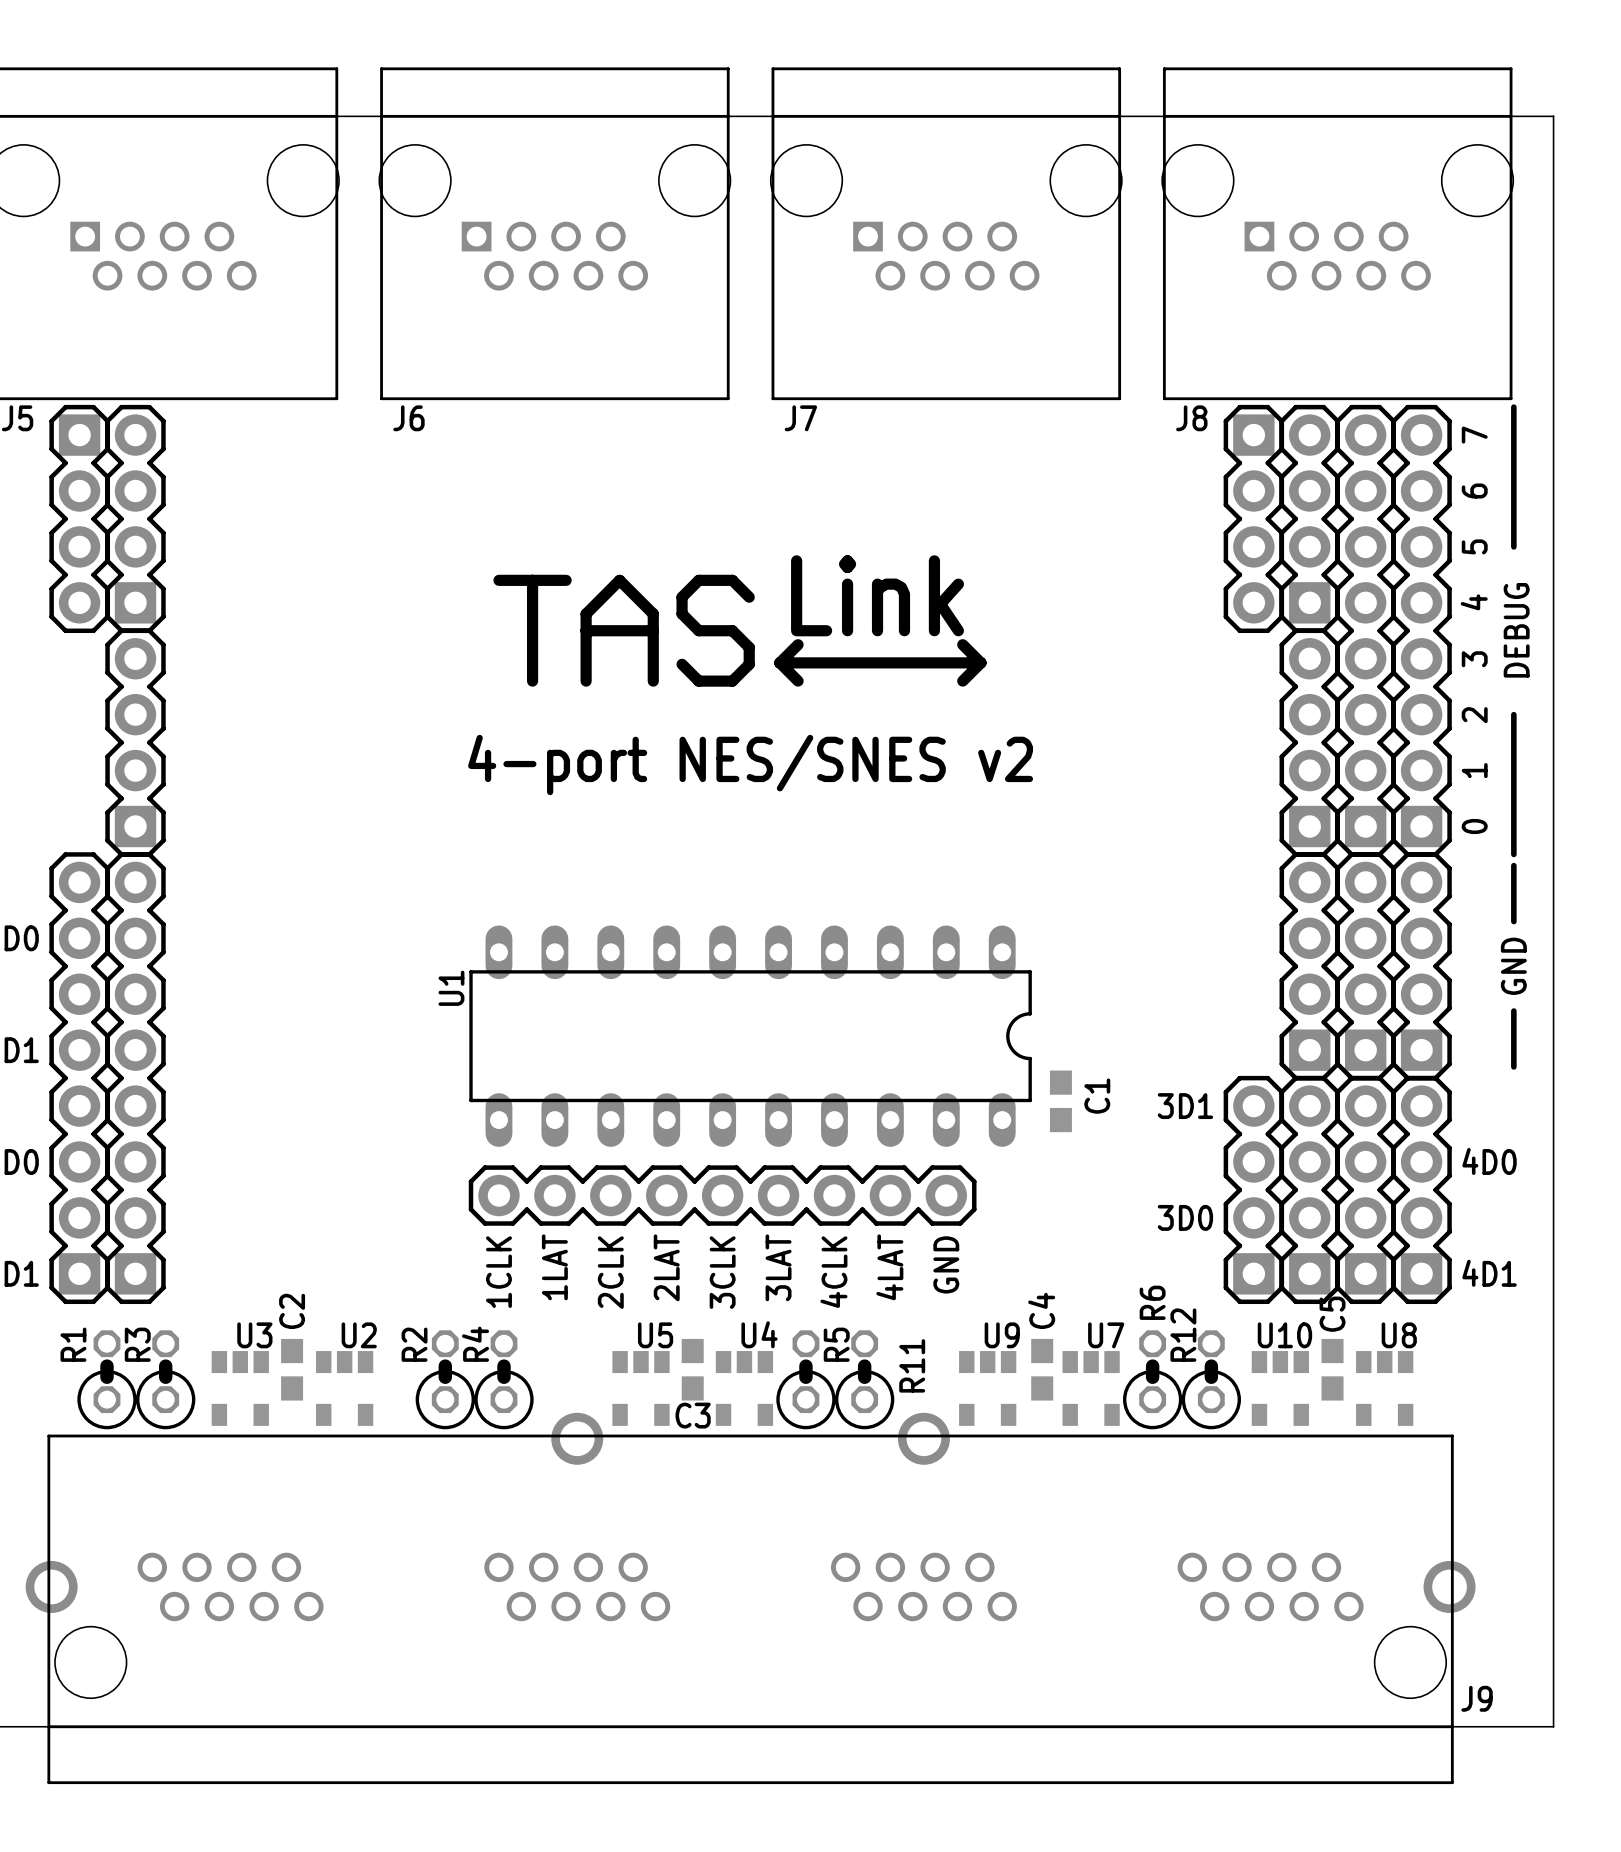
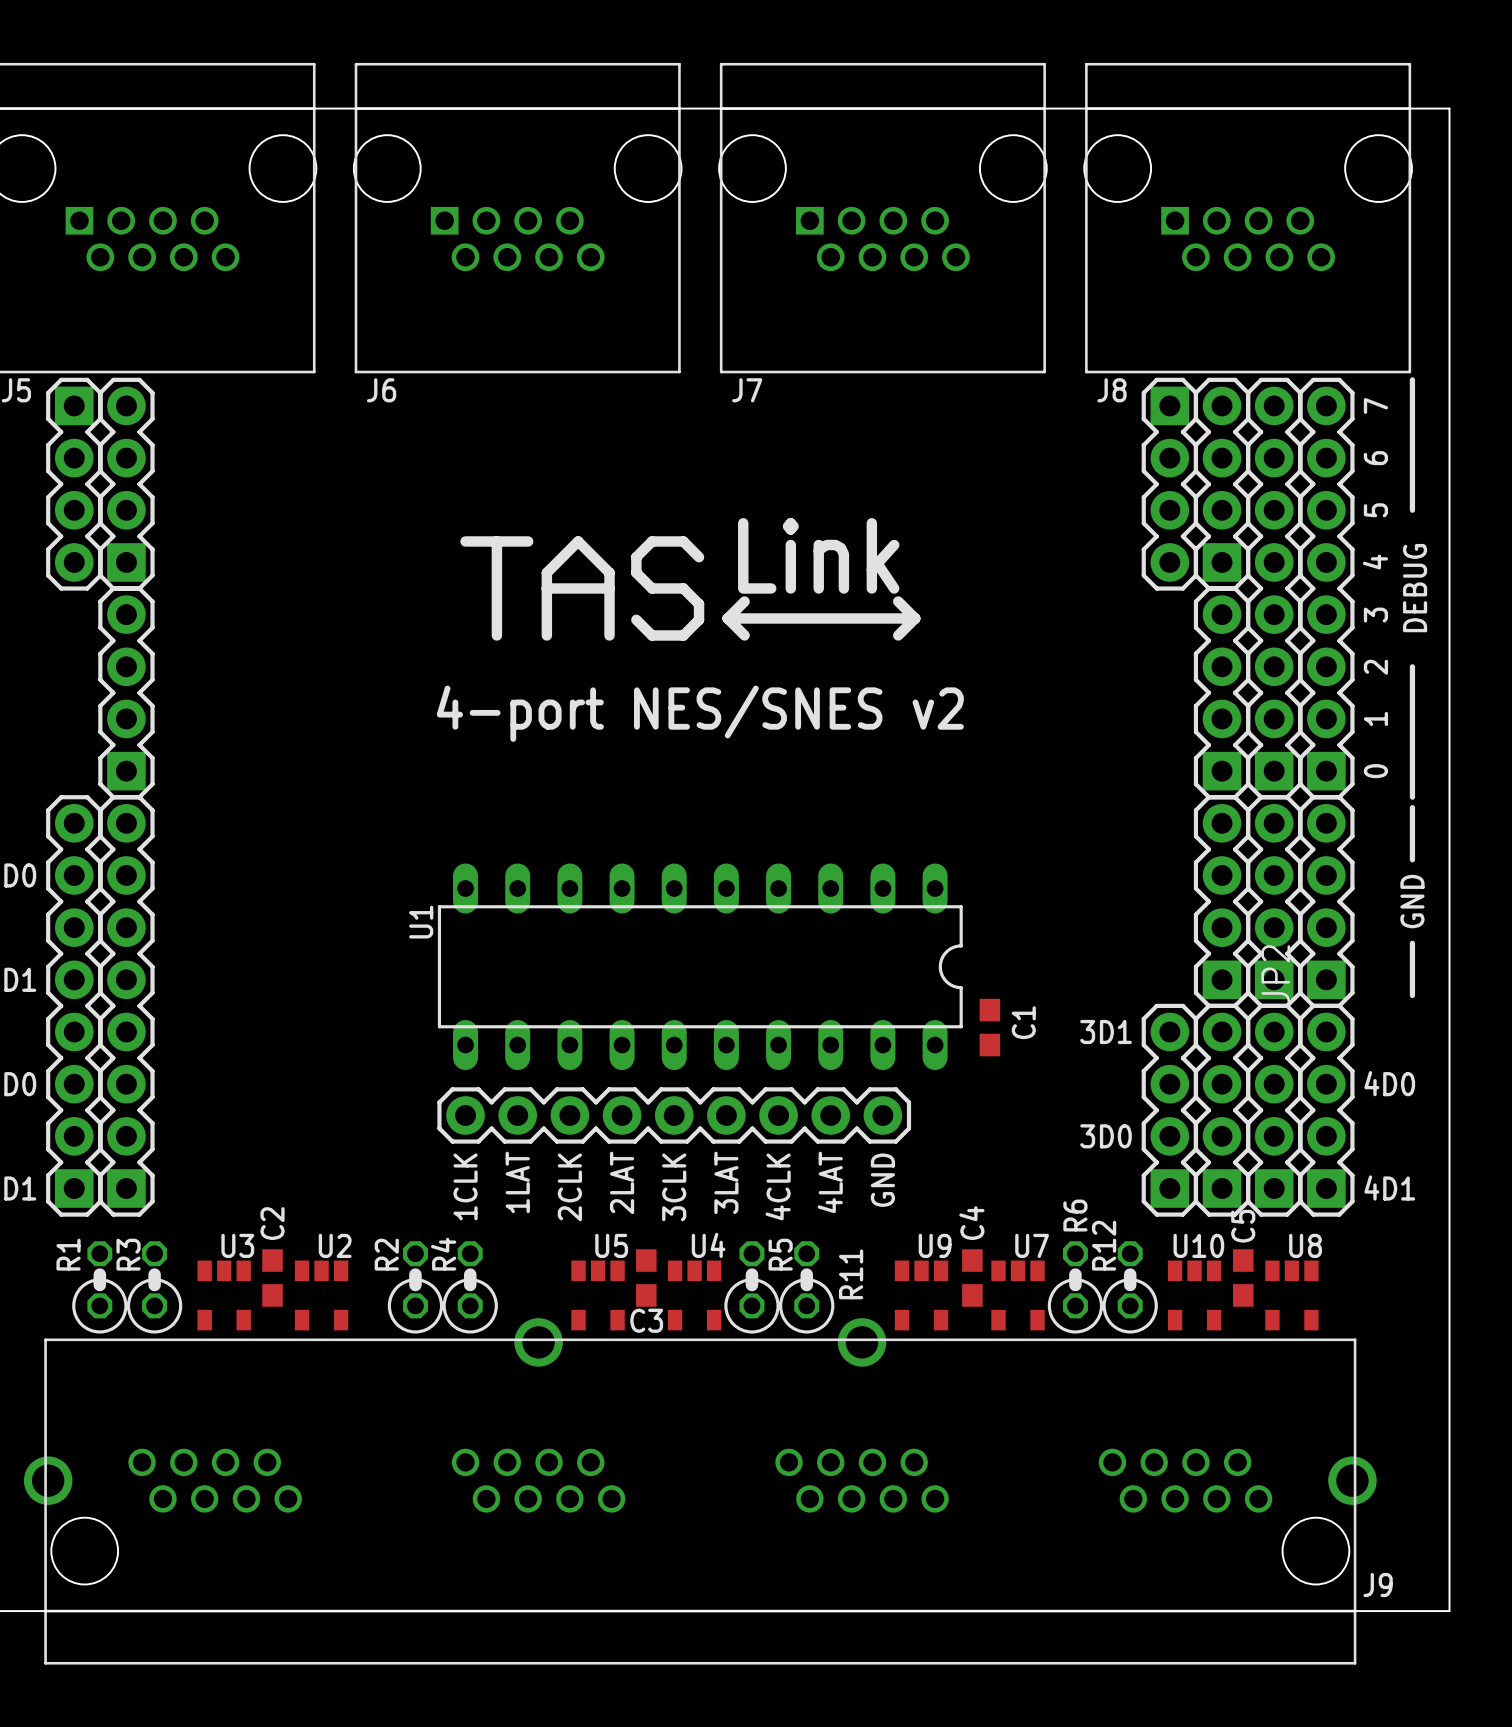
JP2 name: none -> JP2 (1275, 974)

